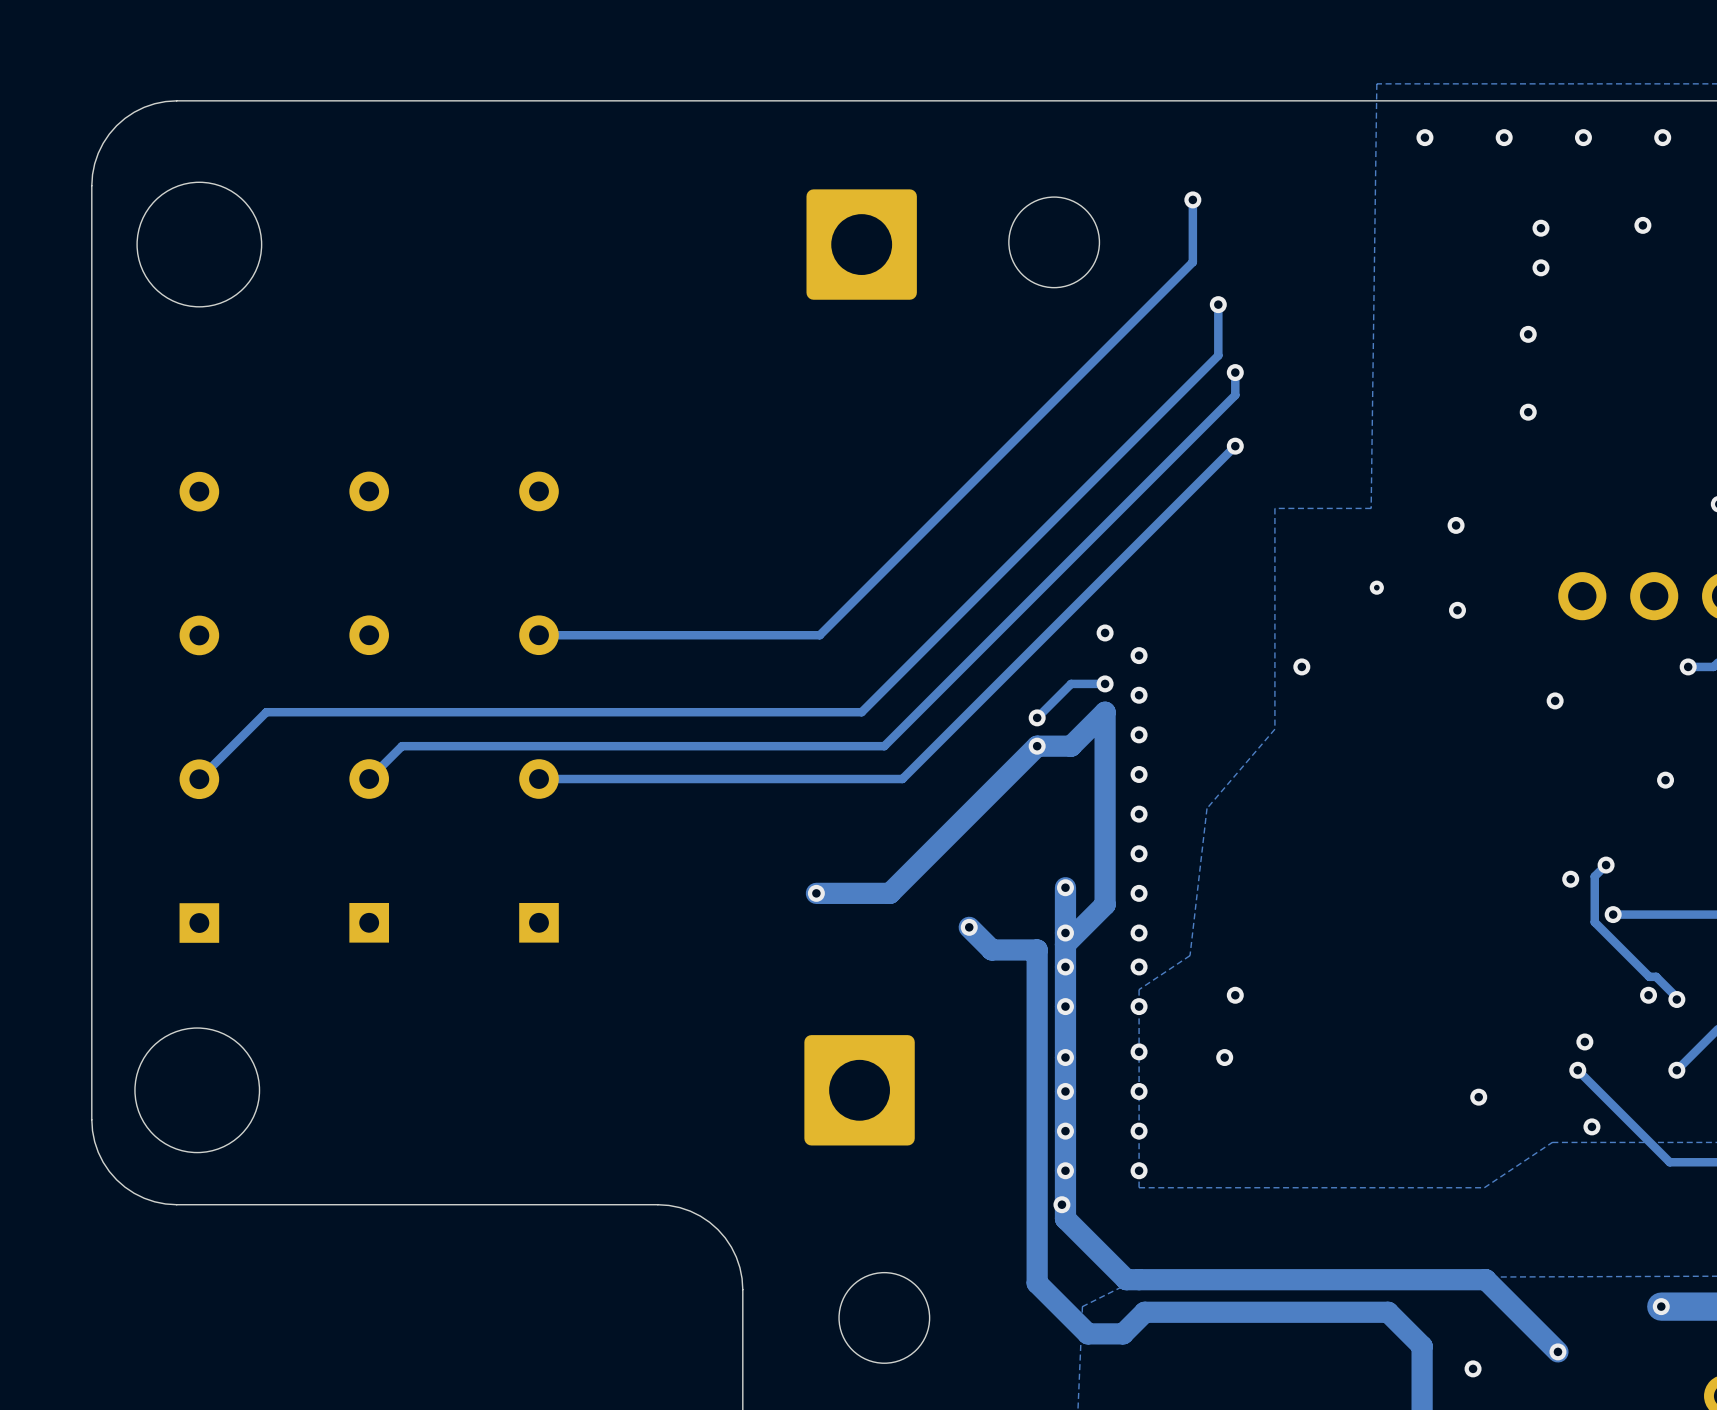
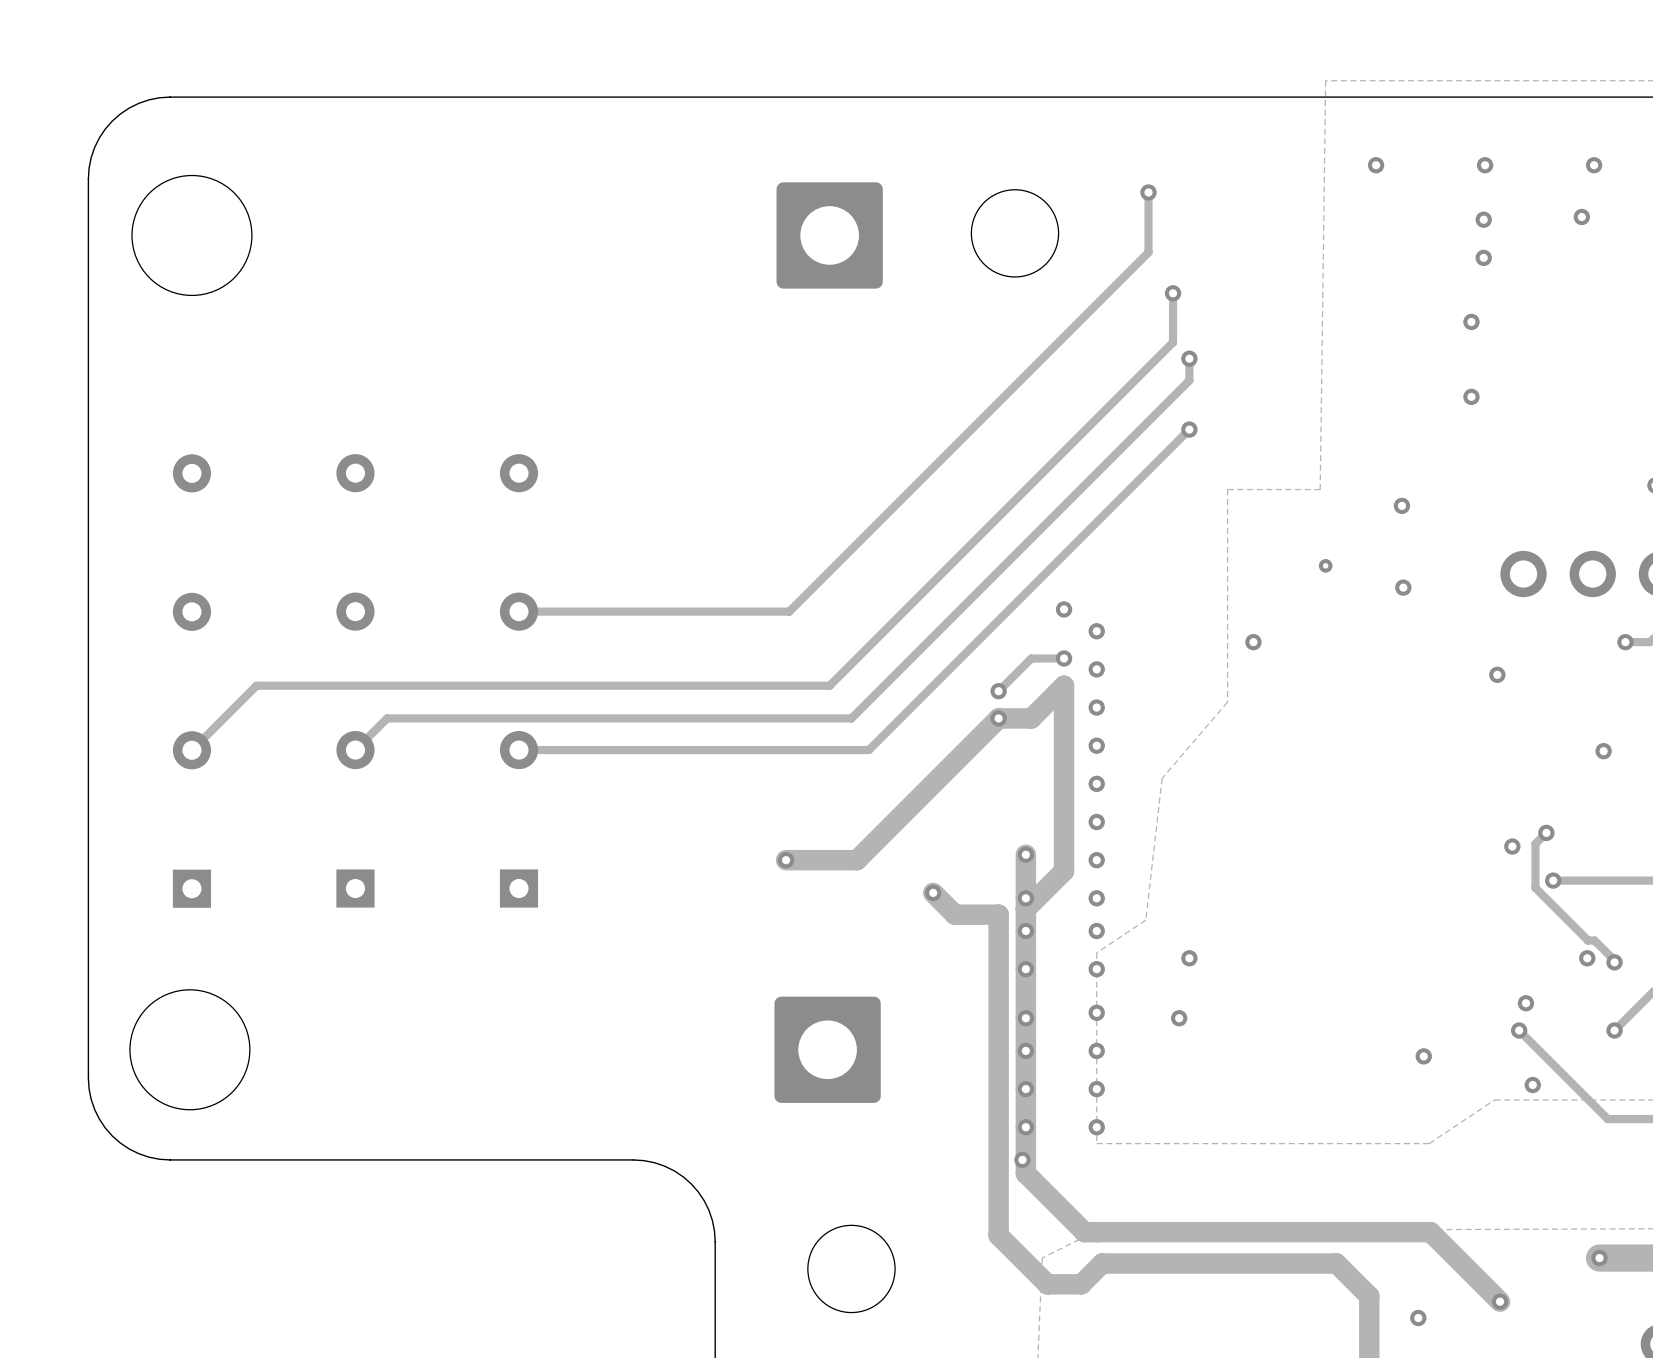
via position: (1424, 137) -> (1376, 165)
via: (1504, 137) -> none
via: (1583, 137) -> none
via position: (1662, 137) -> (1594, 165)
via: none -> (1485, 165)

